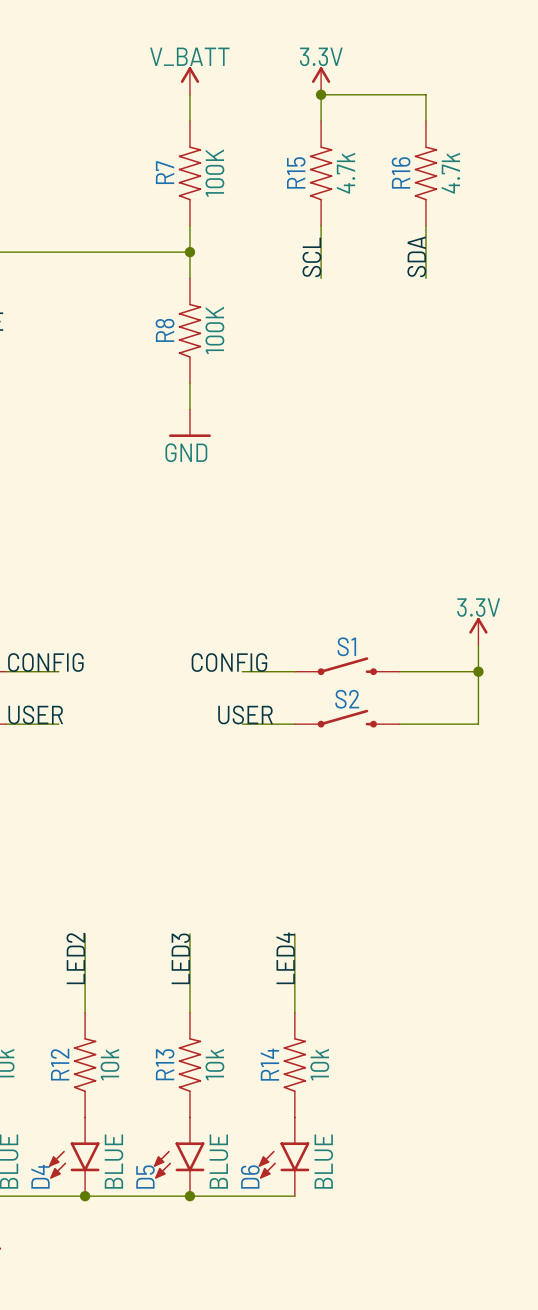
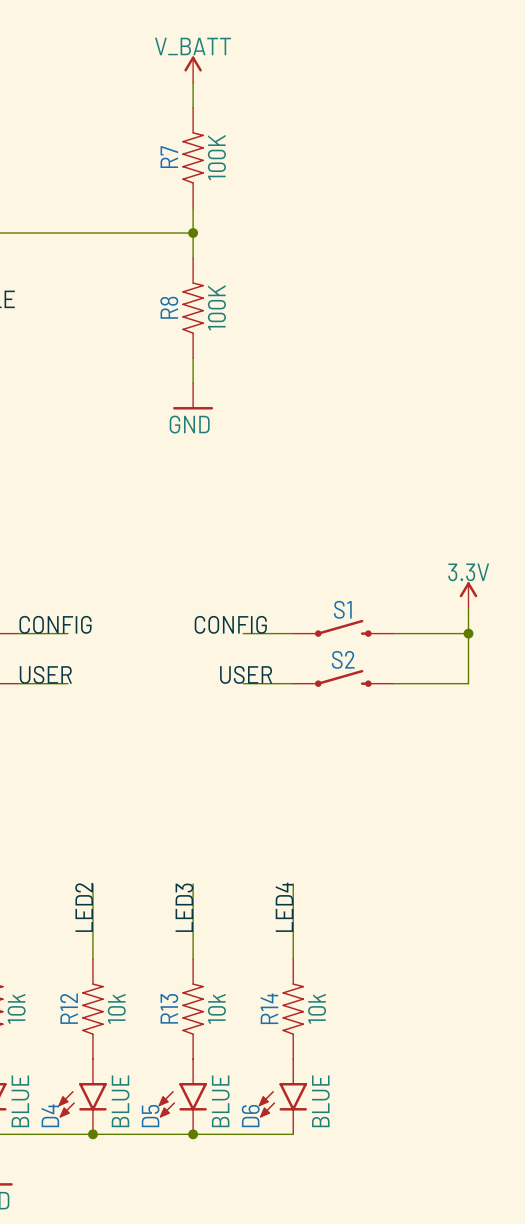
power symbol: 3.3V (321, 81) -> none
junction: (321, 94) -> none
wire: (321, 121) (321, 94) (425, 94) (425, 121) -> none
R15: 4.7k (321, 173) -> none
R16: 4.7k (425, 173) -> none
wire: (321, 225) (321, 278) -> none
wire: (425, 225) (425, 278) -> none
label: SDA (416, 256) -> none
label: SCL (311, 257) -> none

